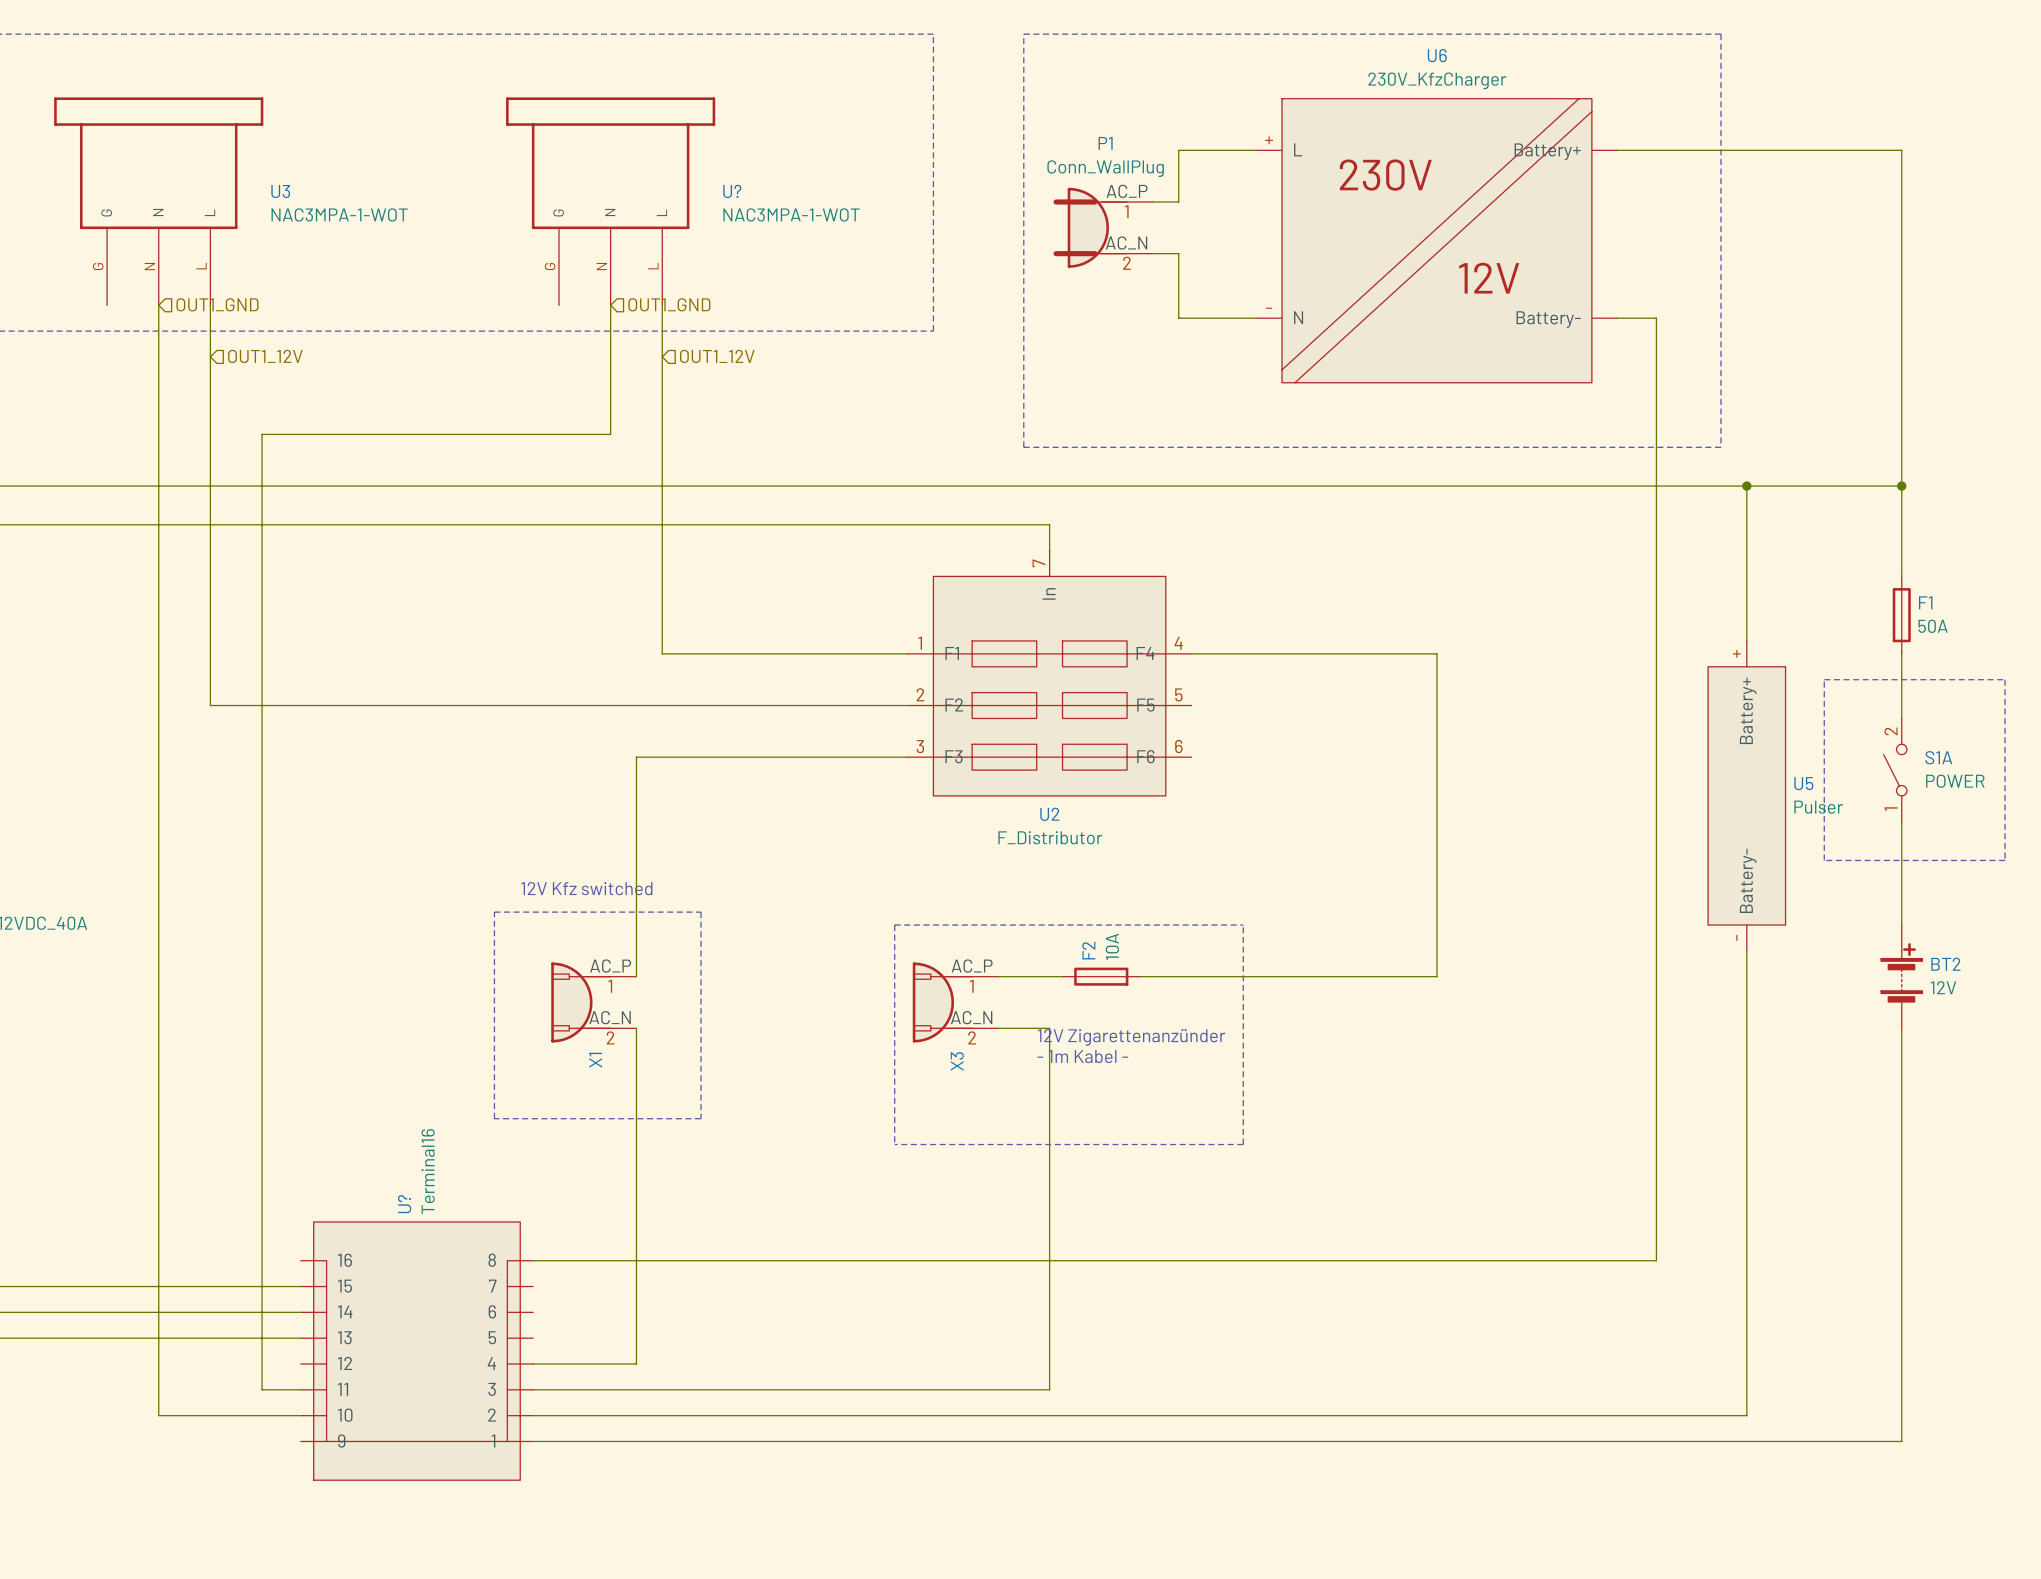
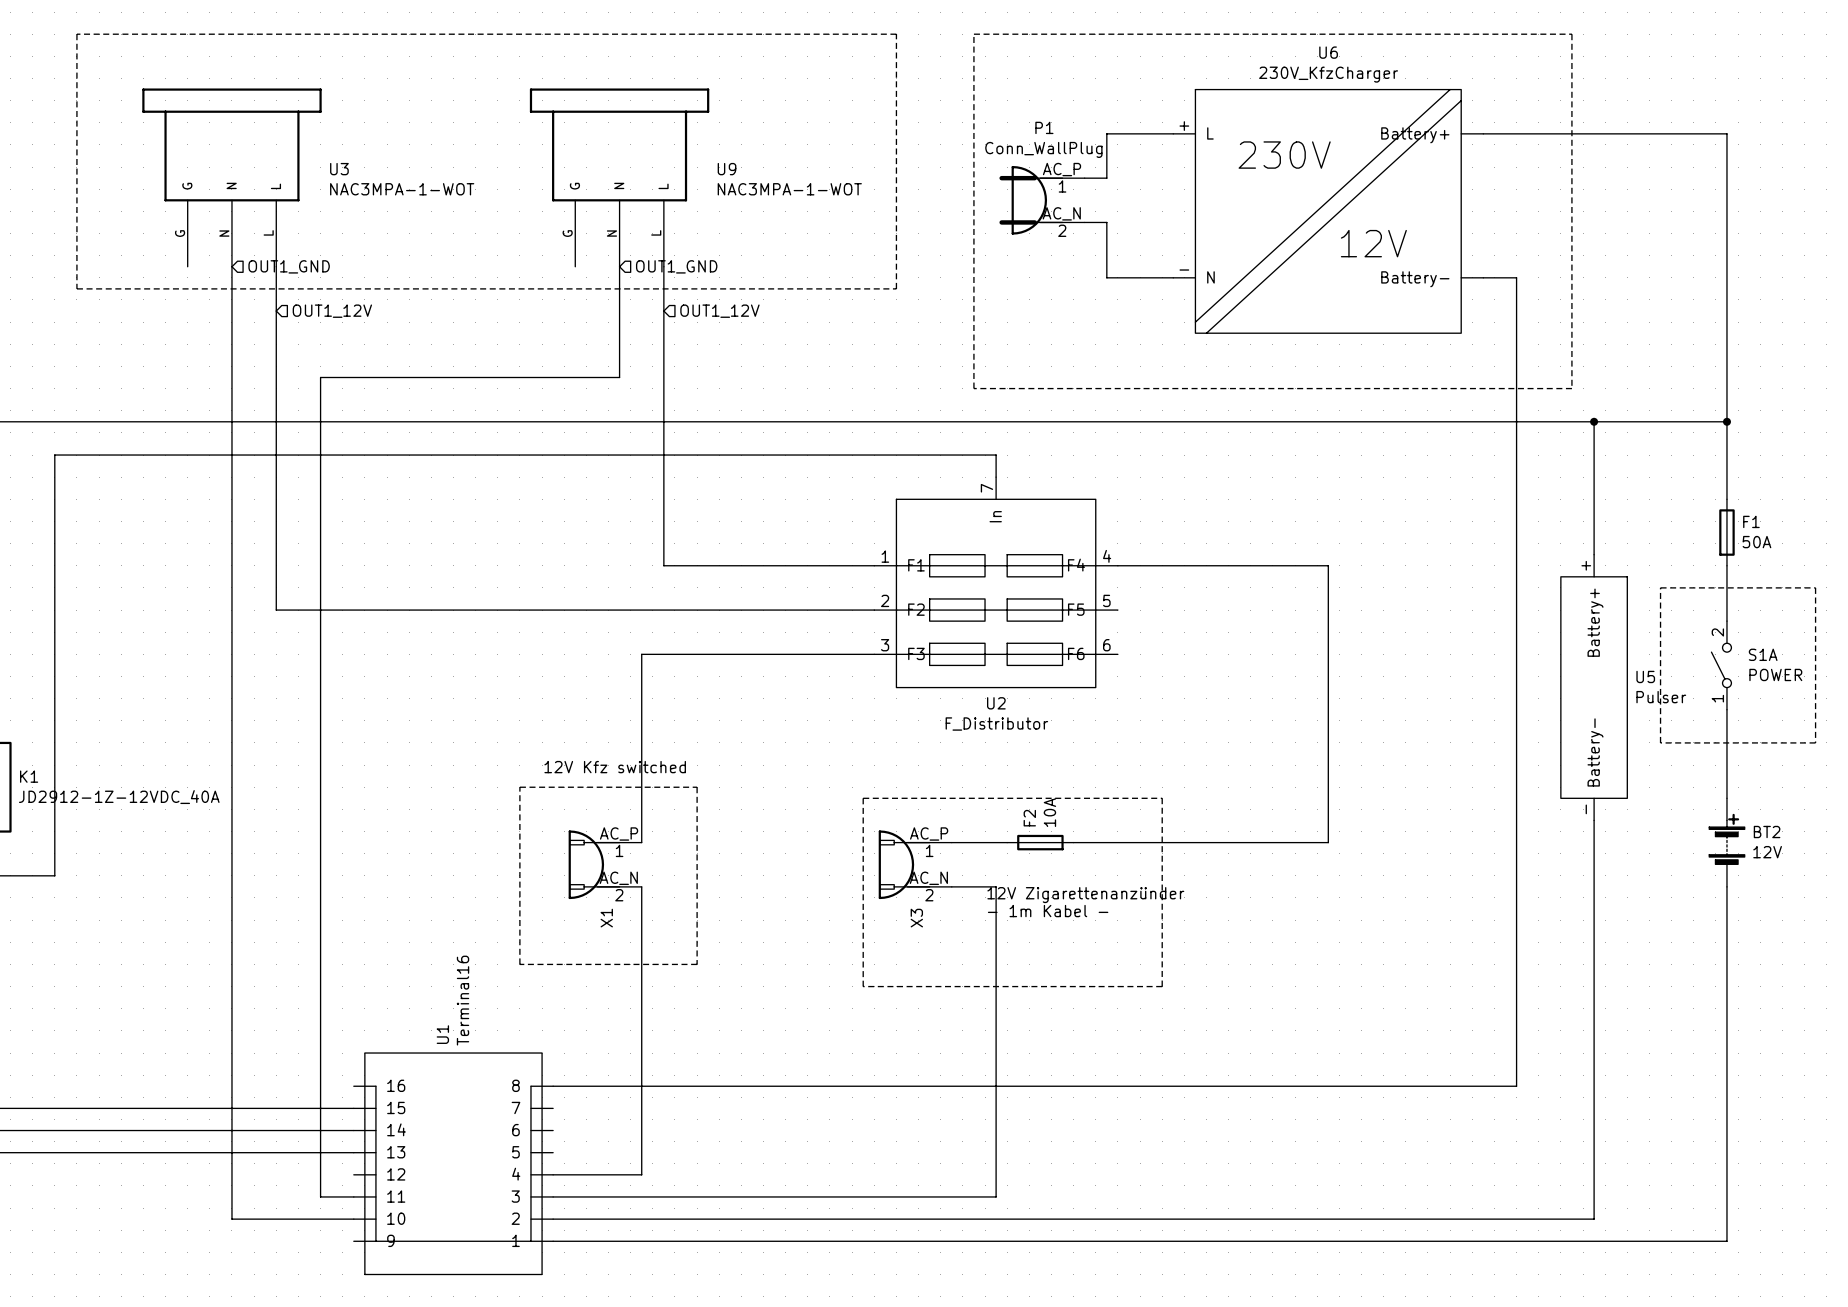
U? name: U? (732, 191) -> U9 (727, 169)
U? name: U? (404, 1204) -> U1 (442, 1034)

